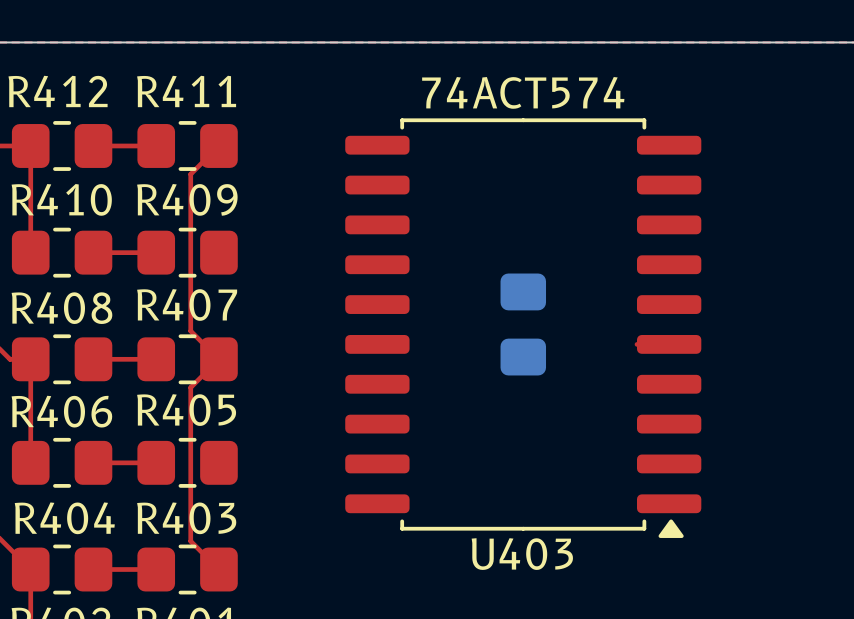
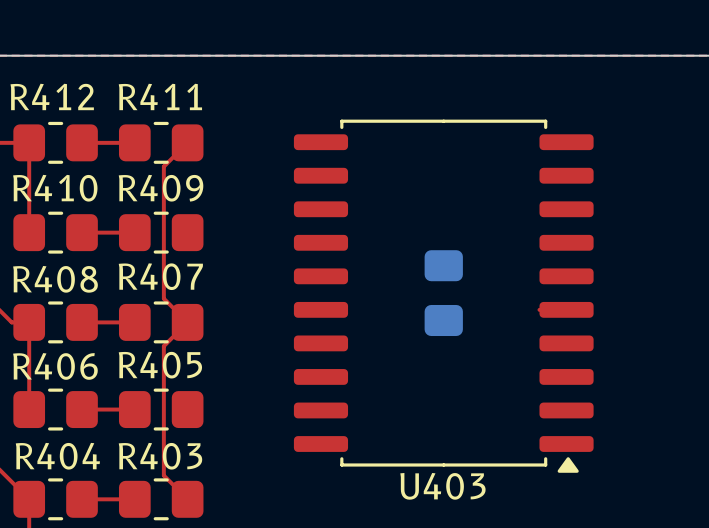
U403 value: 74ACT574 (523, 92) -> none

